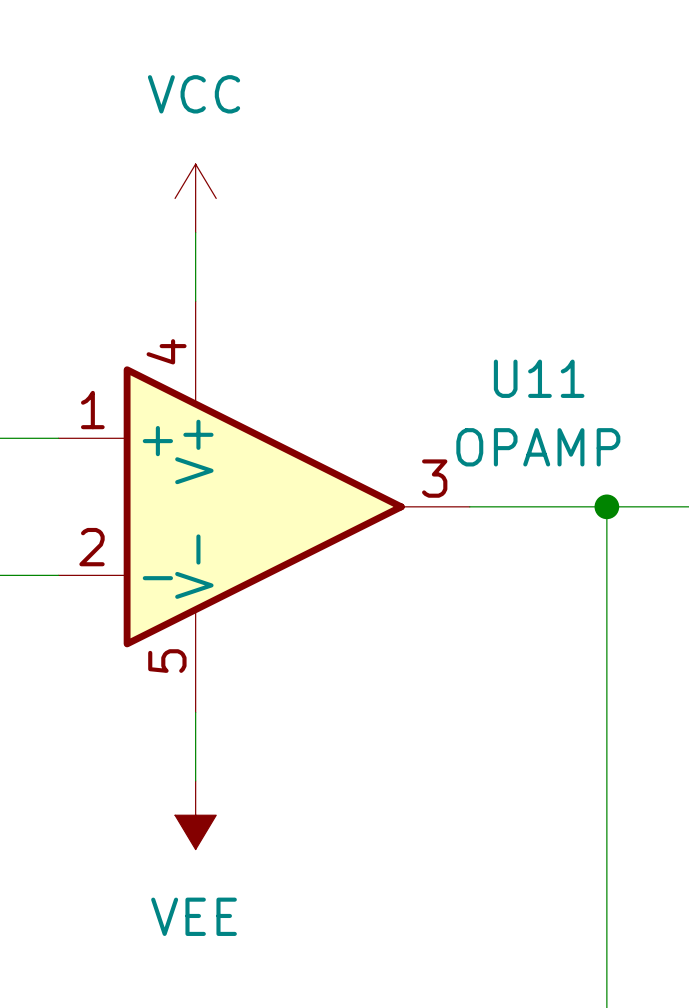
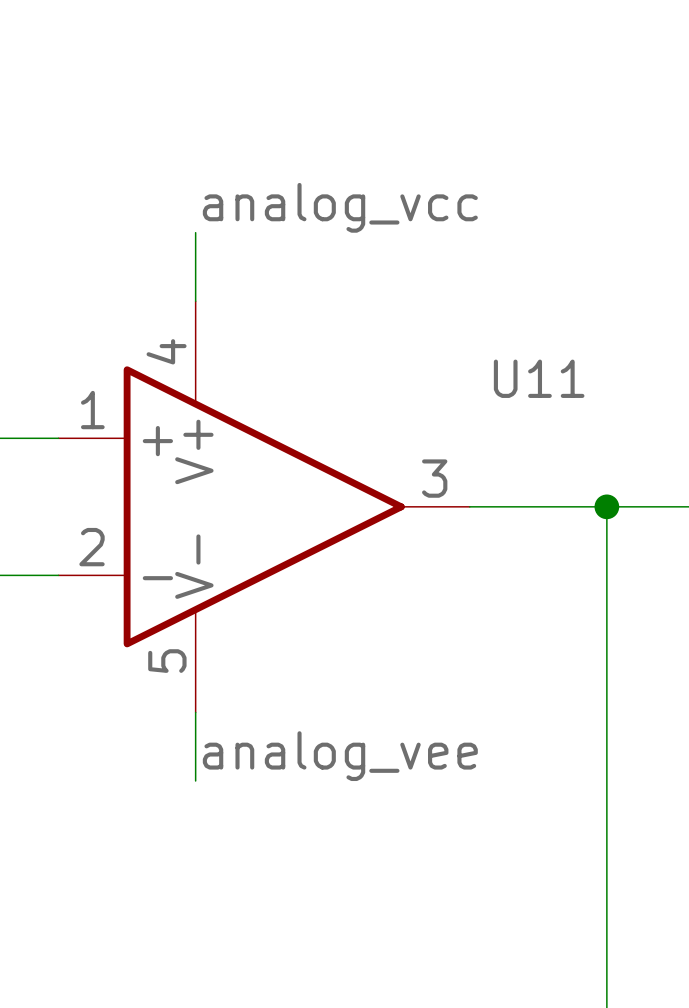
power symbol: VCC (195, 198) -> none
label: none -> analog_vcc (340, 207)
U11 value: OPAMP (538, 447) -> none
label: none -> analog_vee (340, 756)
power symbol: VEE (195, 815) -> none

